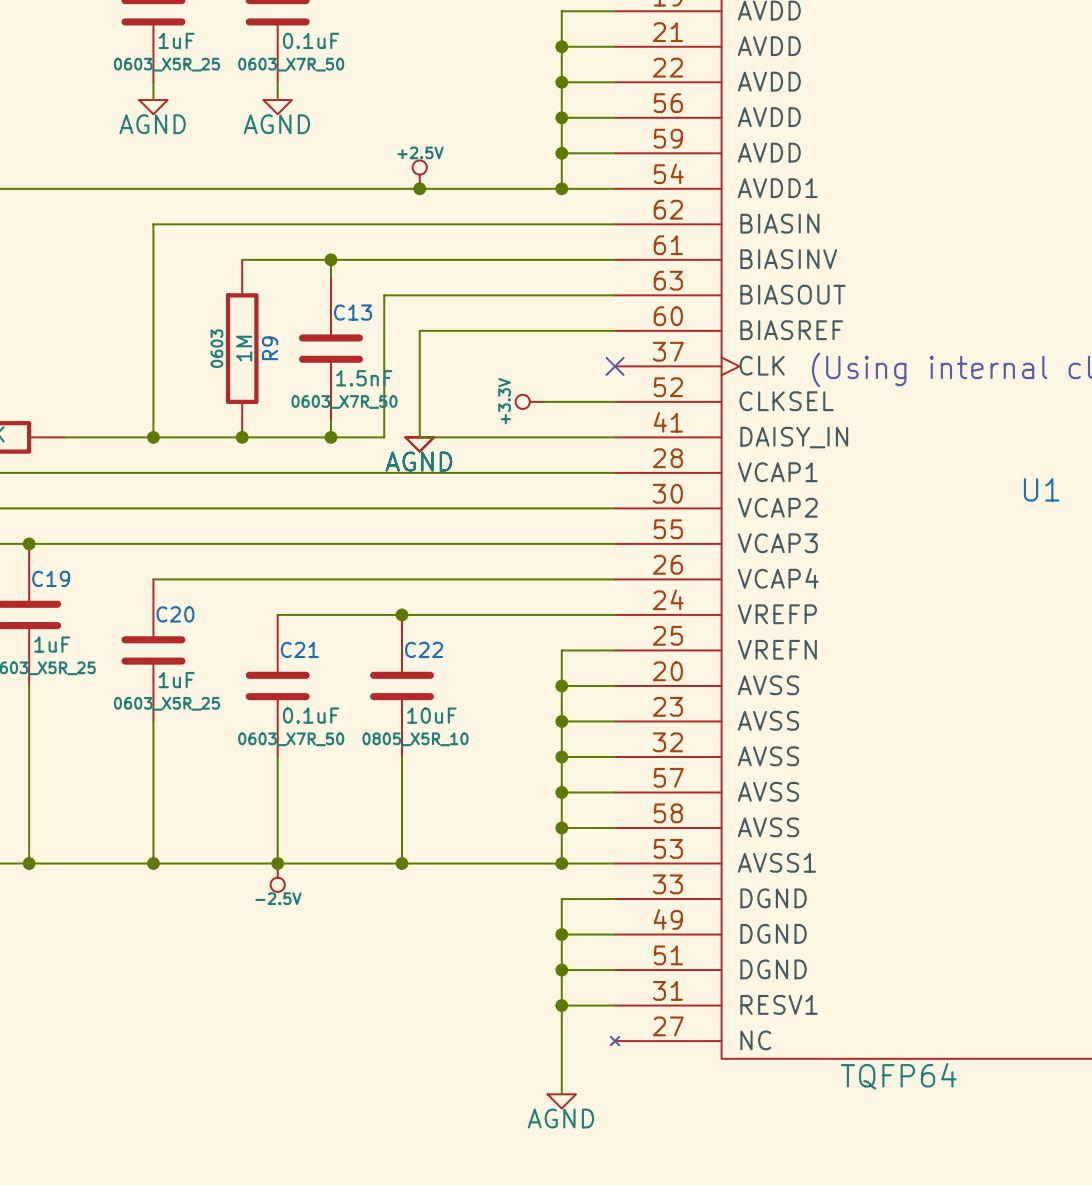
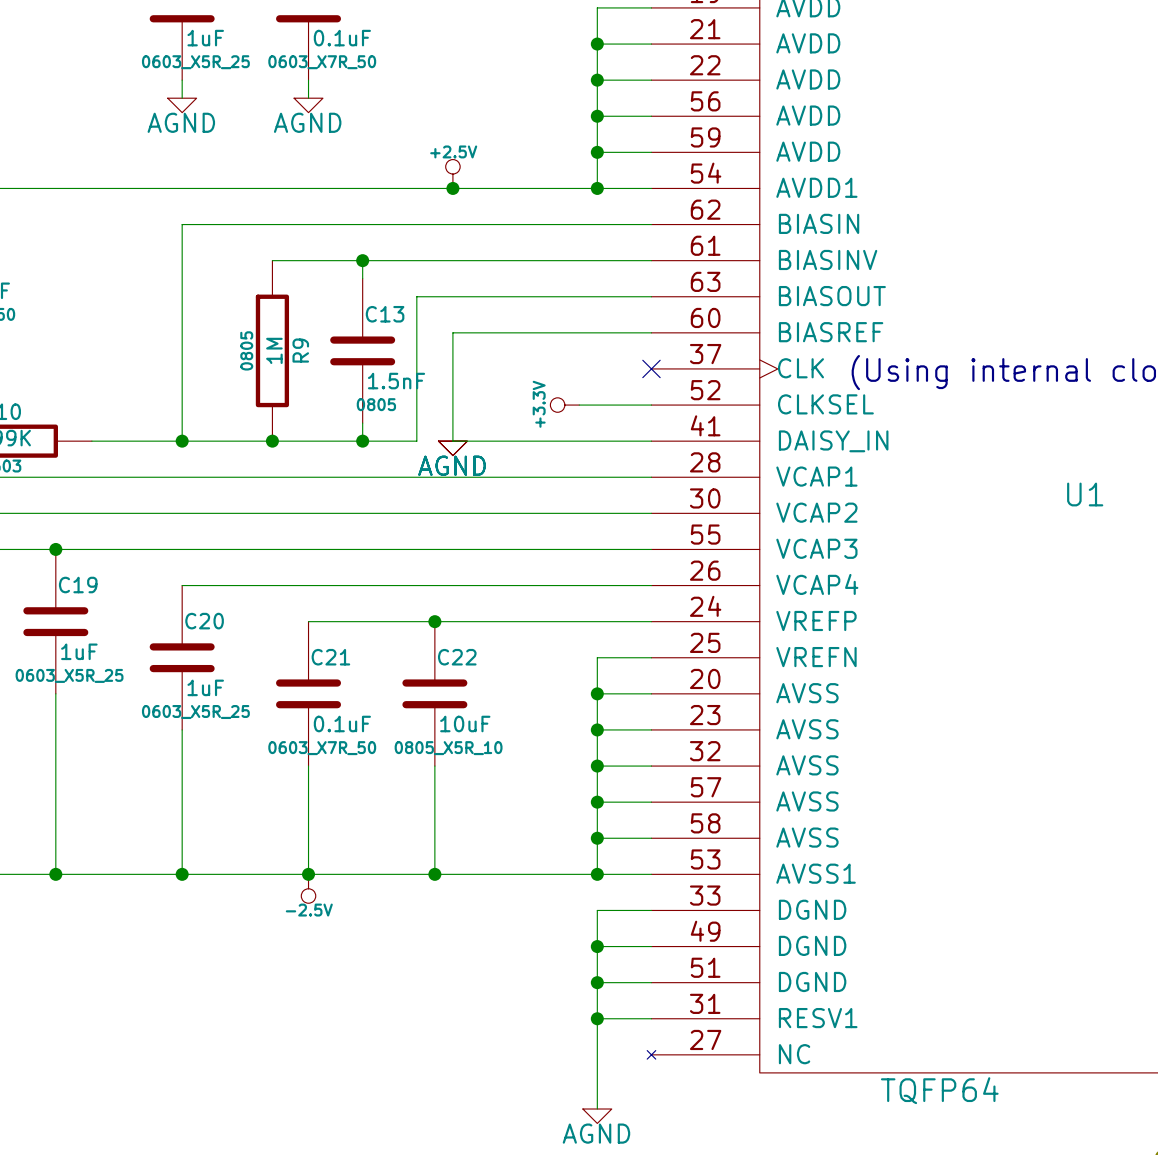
R9 text: 0603 (216, 348) -> 0805 (246, 350)
C13 text: 0603_X7R_50 (344, 401) -> 0805 (376, 404)

